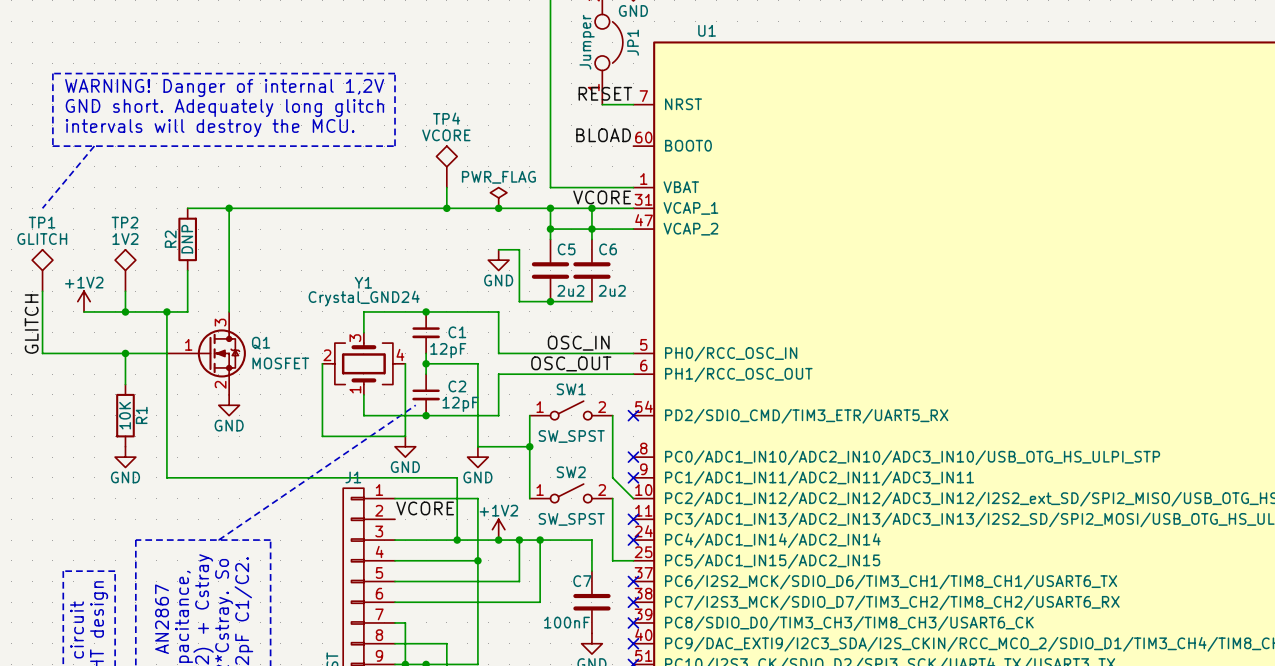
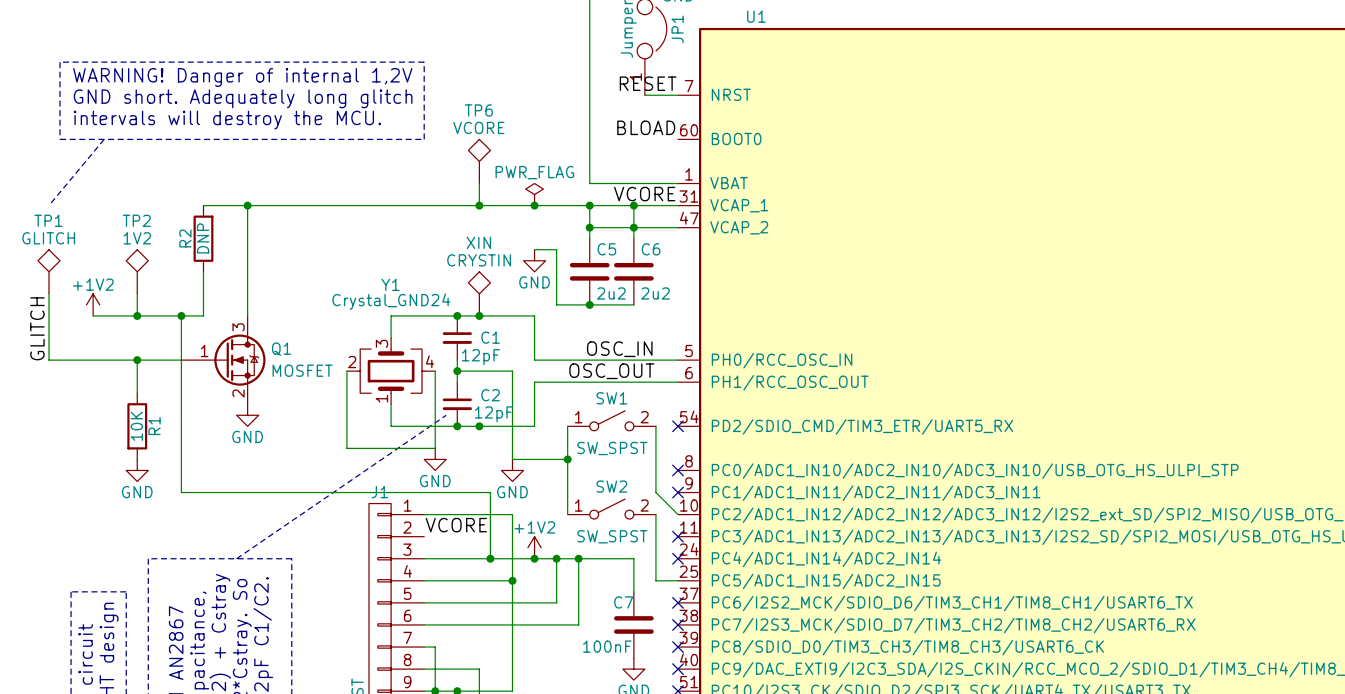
TP4 name: TP4 (446, 118) -> TP6 (478, 110)
XIN: none -> CRYSTIN (479, 293)
junction: none -> (479, 315)
junction: none -> (479, 426)

